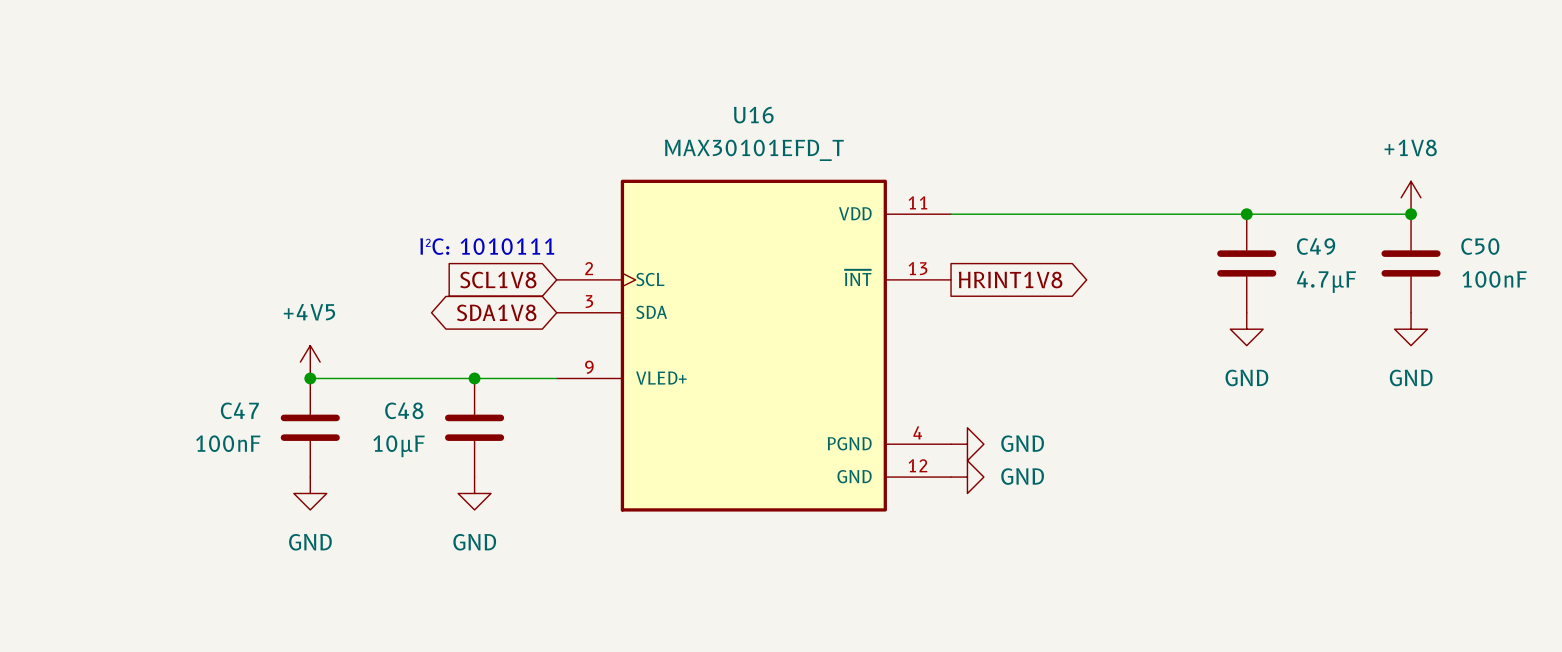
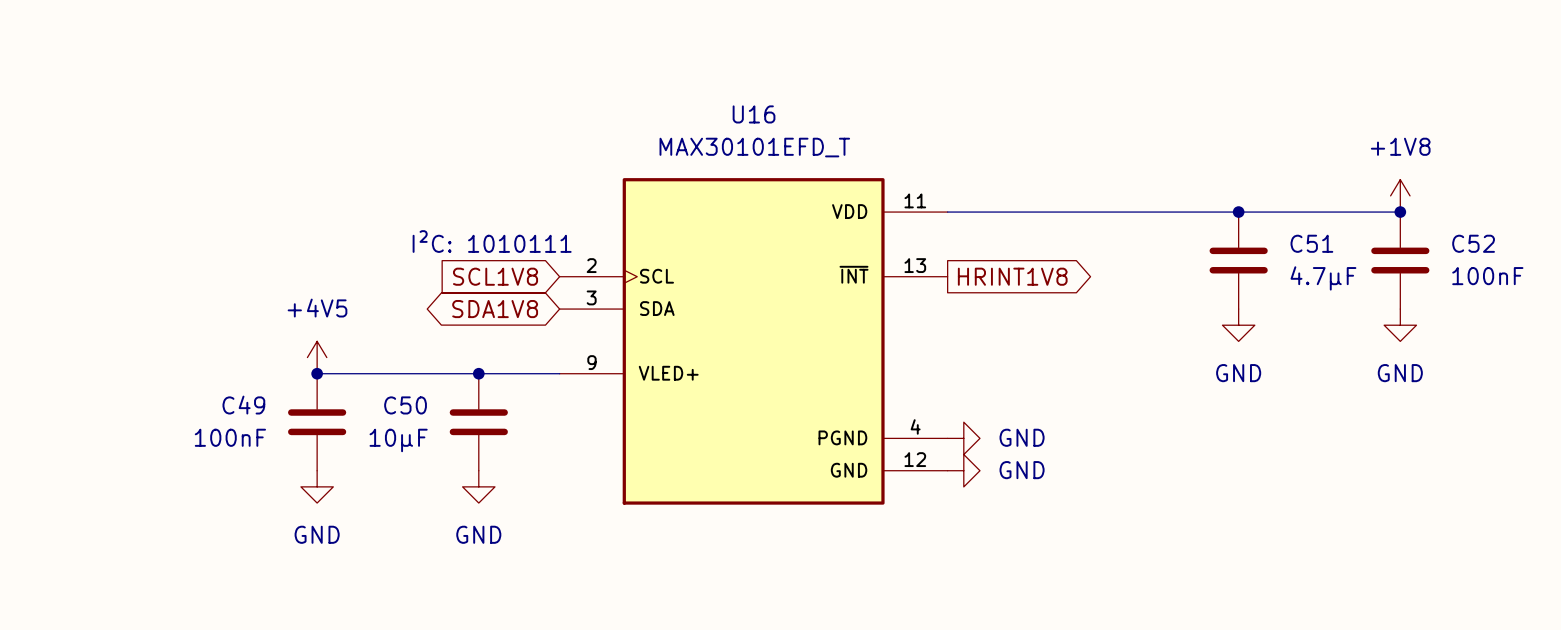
C49 name: C49 (1316, 246) -> C51 (1311, 243)
C50 name: C50 (1480, 246) -> C52 (1473, 243)
C47 name: C47 (239, 410) -> C49 (243, 405)
C48 name: C48 (404, 410) -> C50 (405, 405)

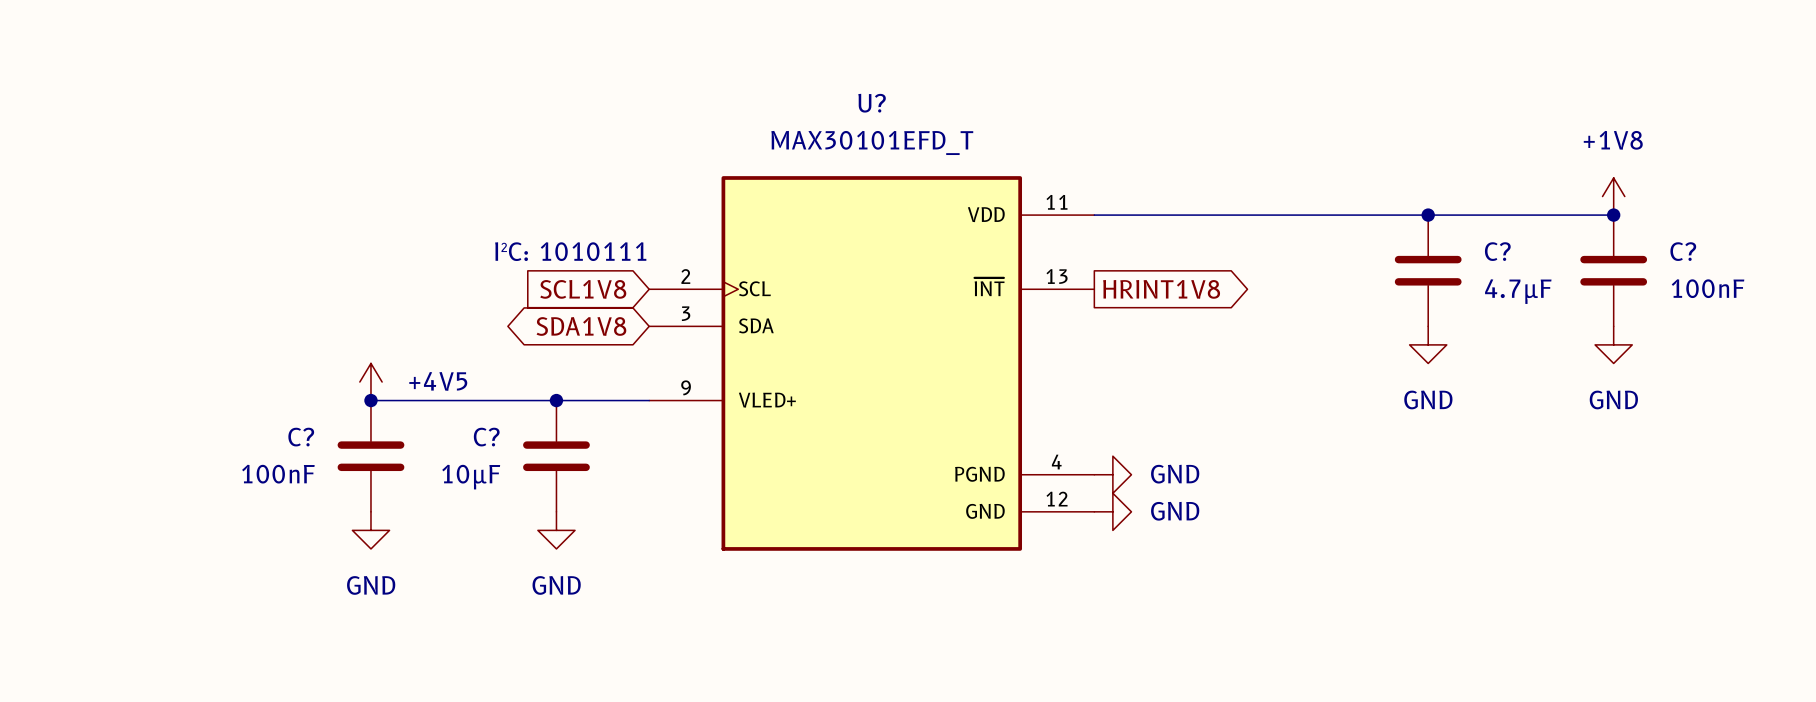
U16 name: U16 (754, 114) -> U? (872, 103)
C51 name: C51 (1311, 243) -> C? (1497, 251)
C52 name: C52 (1473, 243) -> C? (1683, 251)
power symbol text position: +4V5 (317, 308) -> +4V5 (438, 381)
C49 name: C49 (243, 405) -> C? (301, 437)
C50 name: C50 (405, 405) -> C? (486, 437)

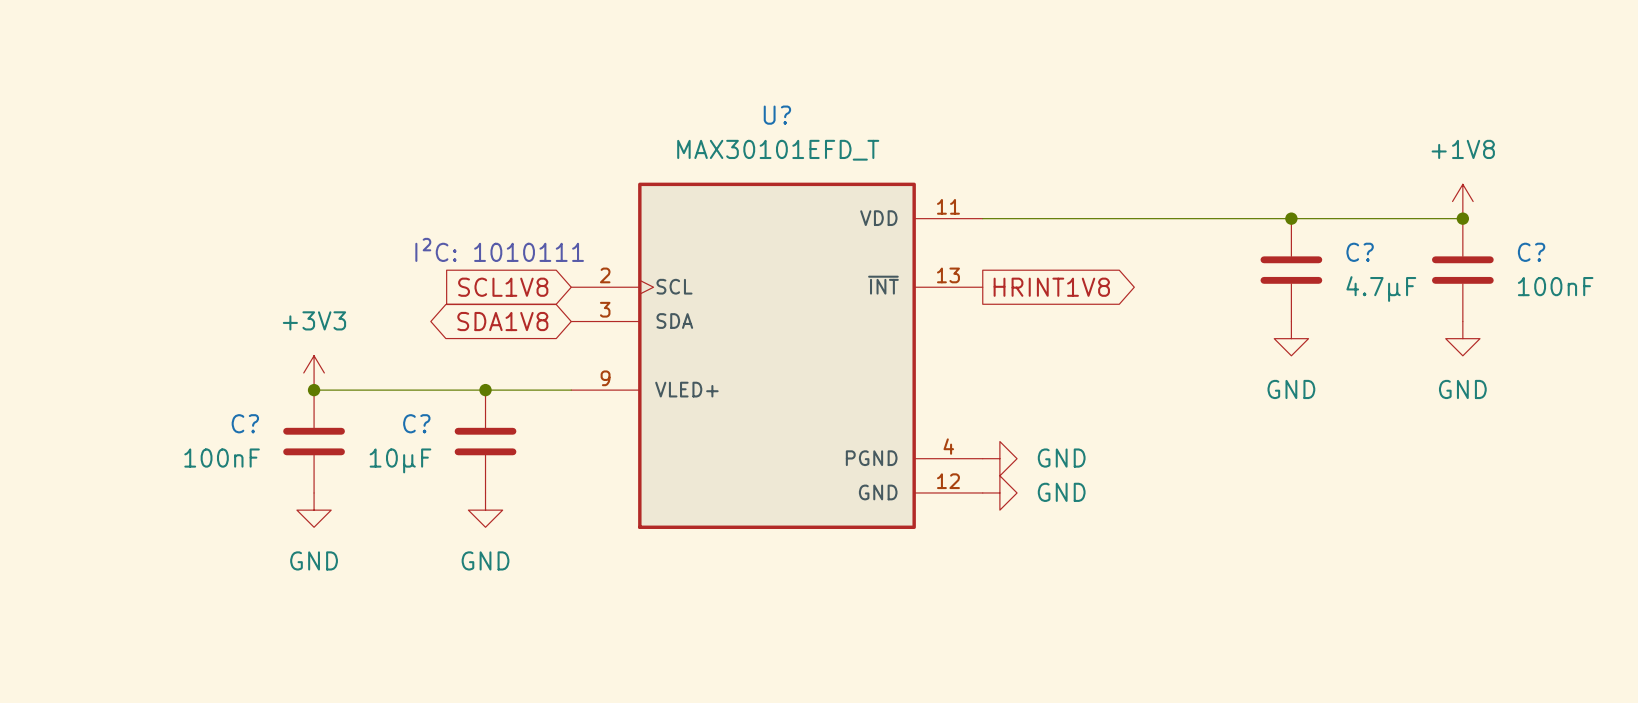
power symbol: +4V5 (370, 382) -> +3V3 (314, 372)

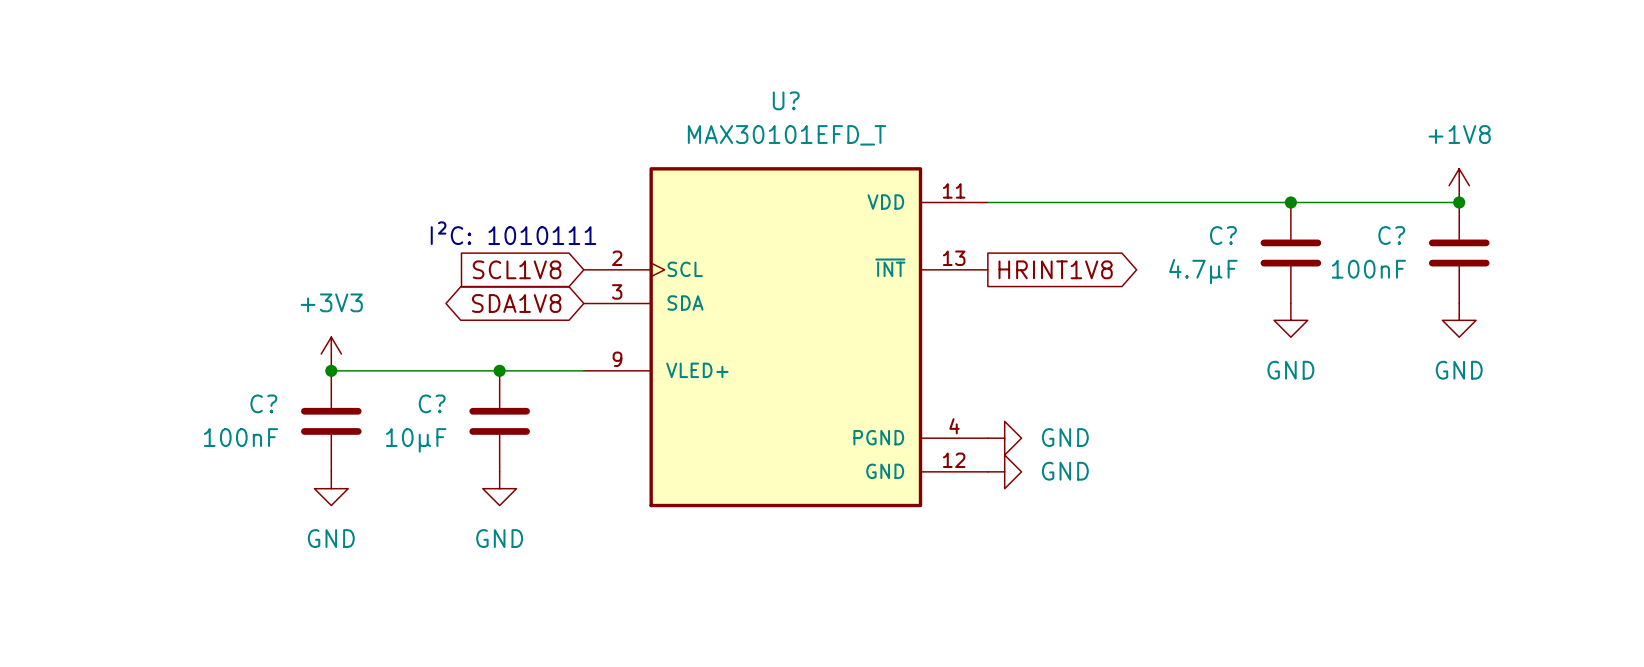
C? name position: C? (1360, 252) -> C? (1223, 235)
C? name position: C? (1531, 252) -> C? (1391, 235)
C? value position: 100nF (1555, 286) -> 100nF (1368, 269)
C? value position: 4.7µF (1381, 289) -> 4.7µF (1203, 271)

